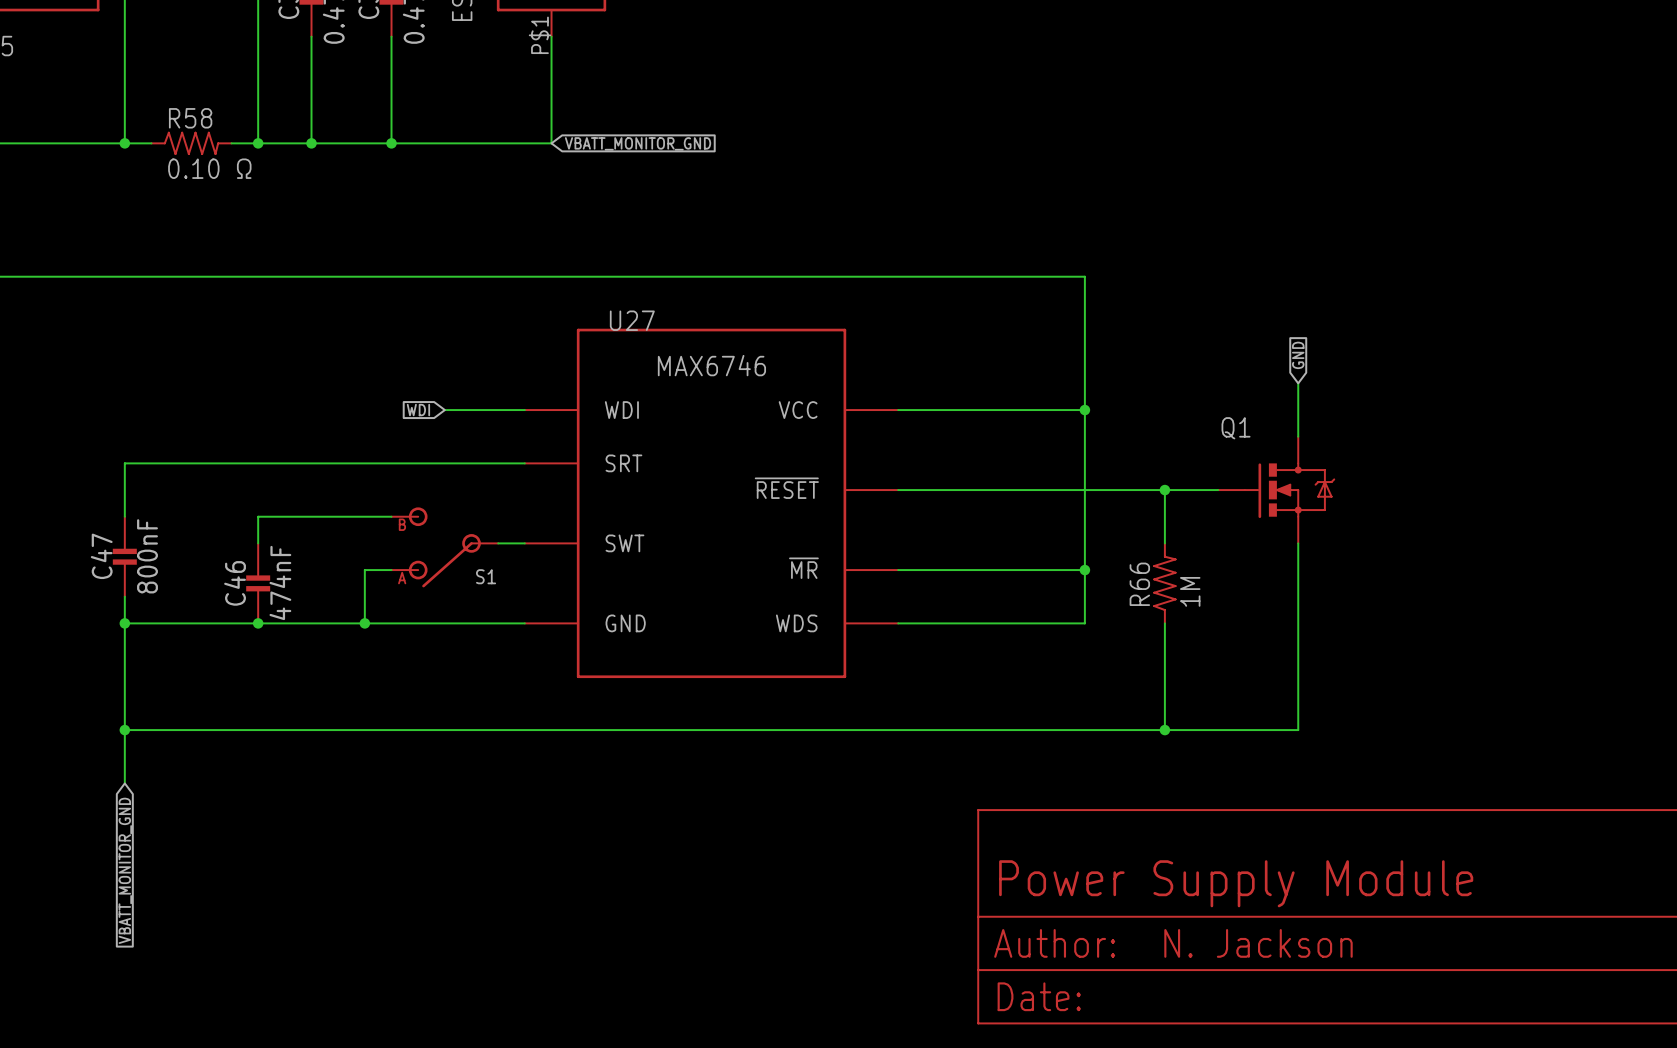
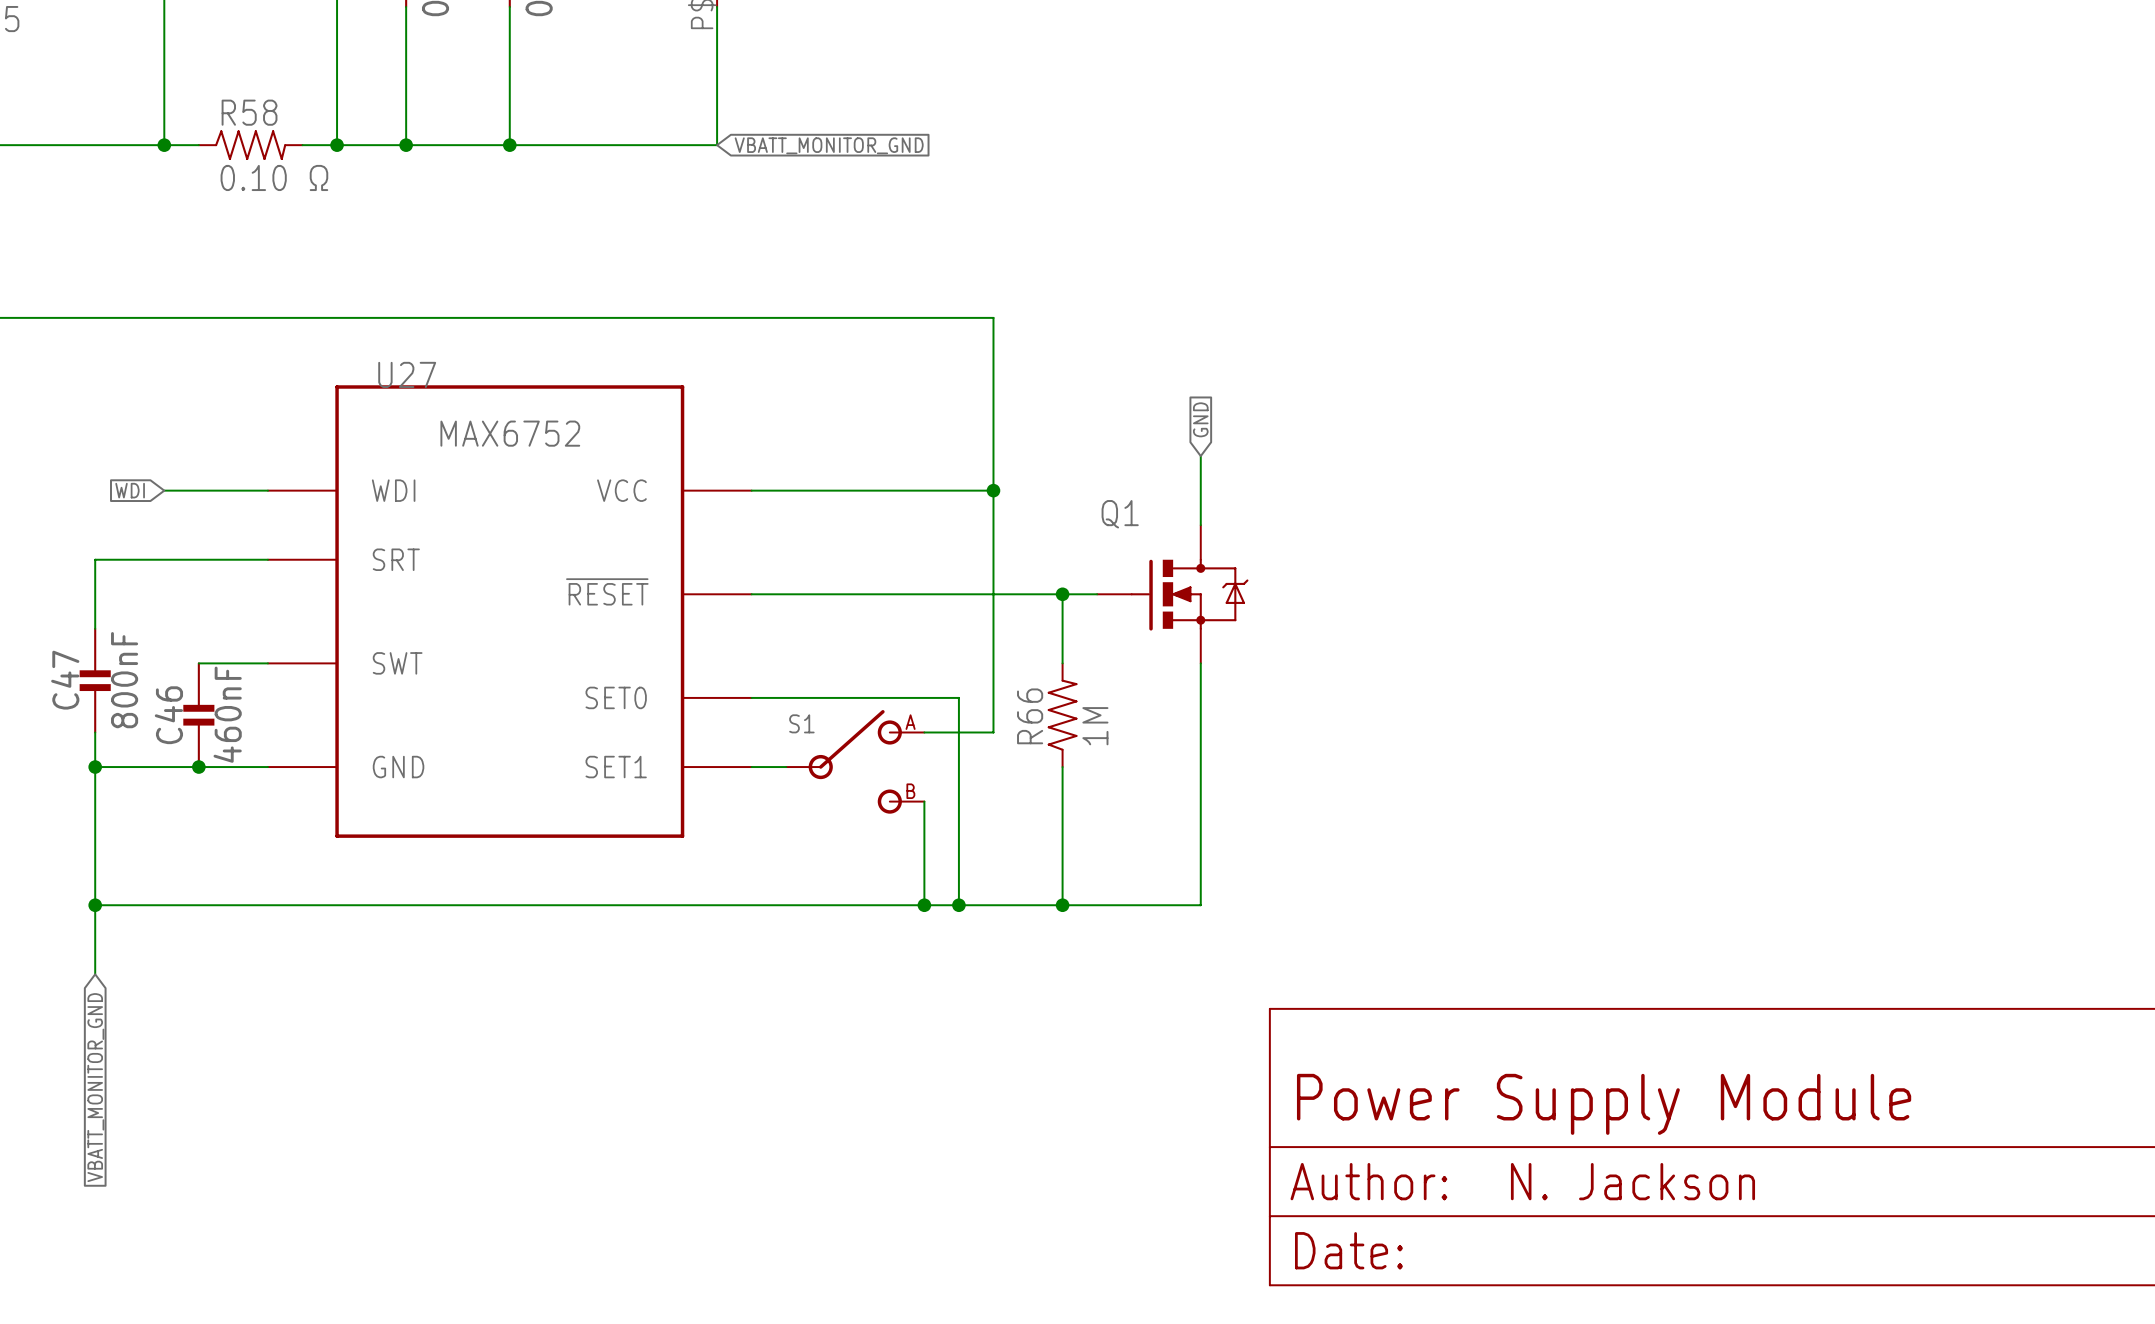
wire: (764, 276) (1084, 276) (1084, 623) (898, 623) -> (993, 317) (993, 732) (924, 732)
global label: none -> GND (1200, 419)
global label: GND (1298, 355) -> none
U27 text: MAX6746 (711, 365) -> MAX6752 (510, 433)
wire: none -> (1200, 456) (1200, 525)
wire: (1298, 383) (1298, 436) -> none
global label: none -> WDI (130, 490)
wire: none -> (164, 490) (267, 490)
global label: WDI (418, 410) -> none
wire: (444, 410) (524, 410) -> none
wire: none -> (751, 490) (993, 490)
junction: none -> (993, 490)
wire: (898, 410) (1084, 410) -> none
junction: (1084, 410) -> none
wire: (124, 463) (124, 516) -> (164, 559) (95, 559) (95, 628)
wire: (204, 463) (524, 463) -> none
wire: none -> (751, 594) (1097, 594)
wire: none -> (1062, 594) (1062, 663)
junction: none -> (1062, 594)
wire: (898, 490) (1218, 490) -> none
wire: (1164, 490) (1164, 543) -> none
junction: (1164, 490) -> none
Q1 position: (1276, 490) -> (1172, 594)
U27 position: (711, 503) -> (509, 611)
S1 symbol: [391, 507, 499, 588] -> [786, 710, 925, 814]
wire: (391, 516) (258, 516) (258, 543) -> none
wire: none -> (198, 663) (267, 663)
wire: (498, 543) (524, 543) -> (751, 767) (786, 767)
wire: (1298, 543) (1298, 730) (924, 730) -> (1200, 663) (1200, 905)
C47 position: (124, 556) -> (95, 680)
U27 pin name: ~{MR} (803, 568) -> SET0 (616, 697)
wire: (391, 570) (364, 570) (364, 623) -> none
wire: none -> (751, 697) (958, 697) (958, 905)
wire: (898, 570) (1084, 570) -> none
junction: (1084, 570) -> none
S1 name position: S1 (486, 576) -> S1 (801, 723)
C46 value: 474nF (280, 582) -> 460nF (227, 714)
C46 position: (258, 583) -> (198, 715)
R66 position: (1164, 583) -> (1062, 715)
wire: (124, 596) (124, 783) -> (95, 732) (95, 974)
wire: none -> (95, 767) (164, 767)
junction: none -> (95, 767)
junction: (124, 623) -> none
junction: none -> (198, 767)
wire: (204, 623) (524, 623) -> none
junction: (258, 623) -> none
junction: (364, 623) -> none
U27 pin name: WDS (796, 623) -> SET1 (616, 767)
wire: none -> (1062, 767) (1062, 905)
wire: (1164, 623) (1164, 730) -> none
wire: none -> (924, 801) (924, 905)
wire: none -> (95, 905) (164, 905)
junction position: (124, 730) -> (95, 905)
junction: none -> (924, 905)
junction: none -> (958, 905)
junction: none -> (1062, 905)
junction: (1164, 730) -> none
global label position: VBATT_MONITOR_GND (125, 870) -> VBATT_MONITOR_GND (95, 1087)

